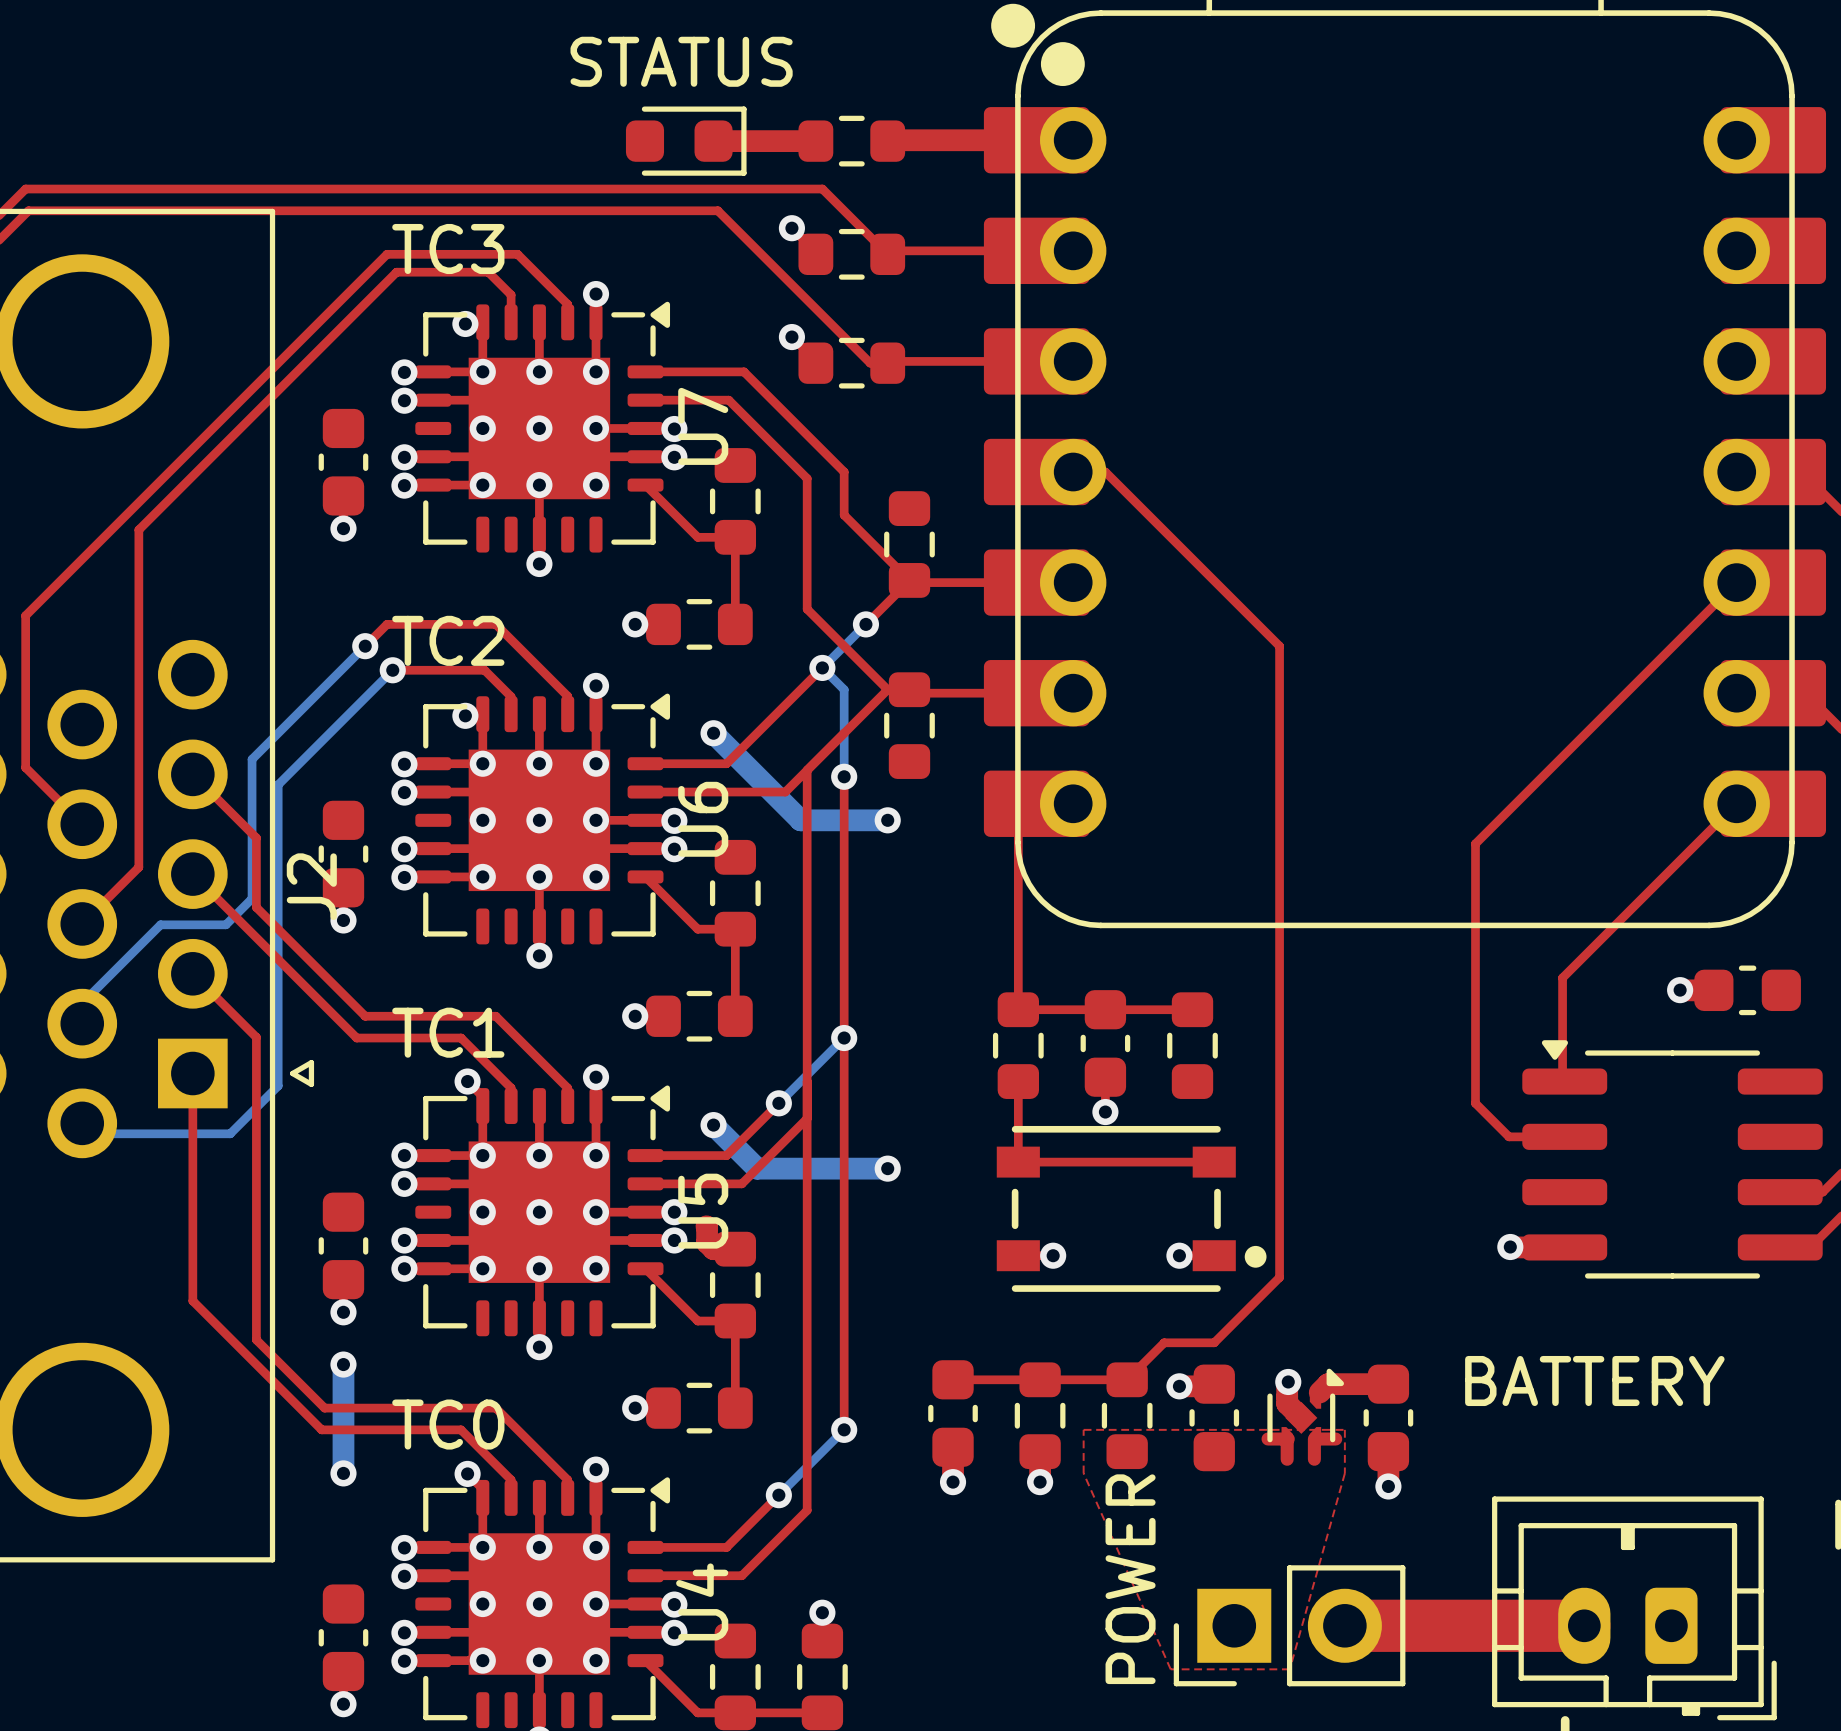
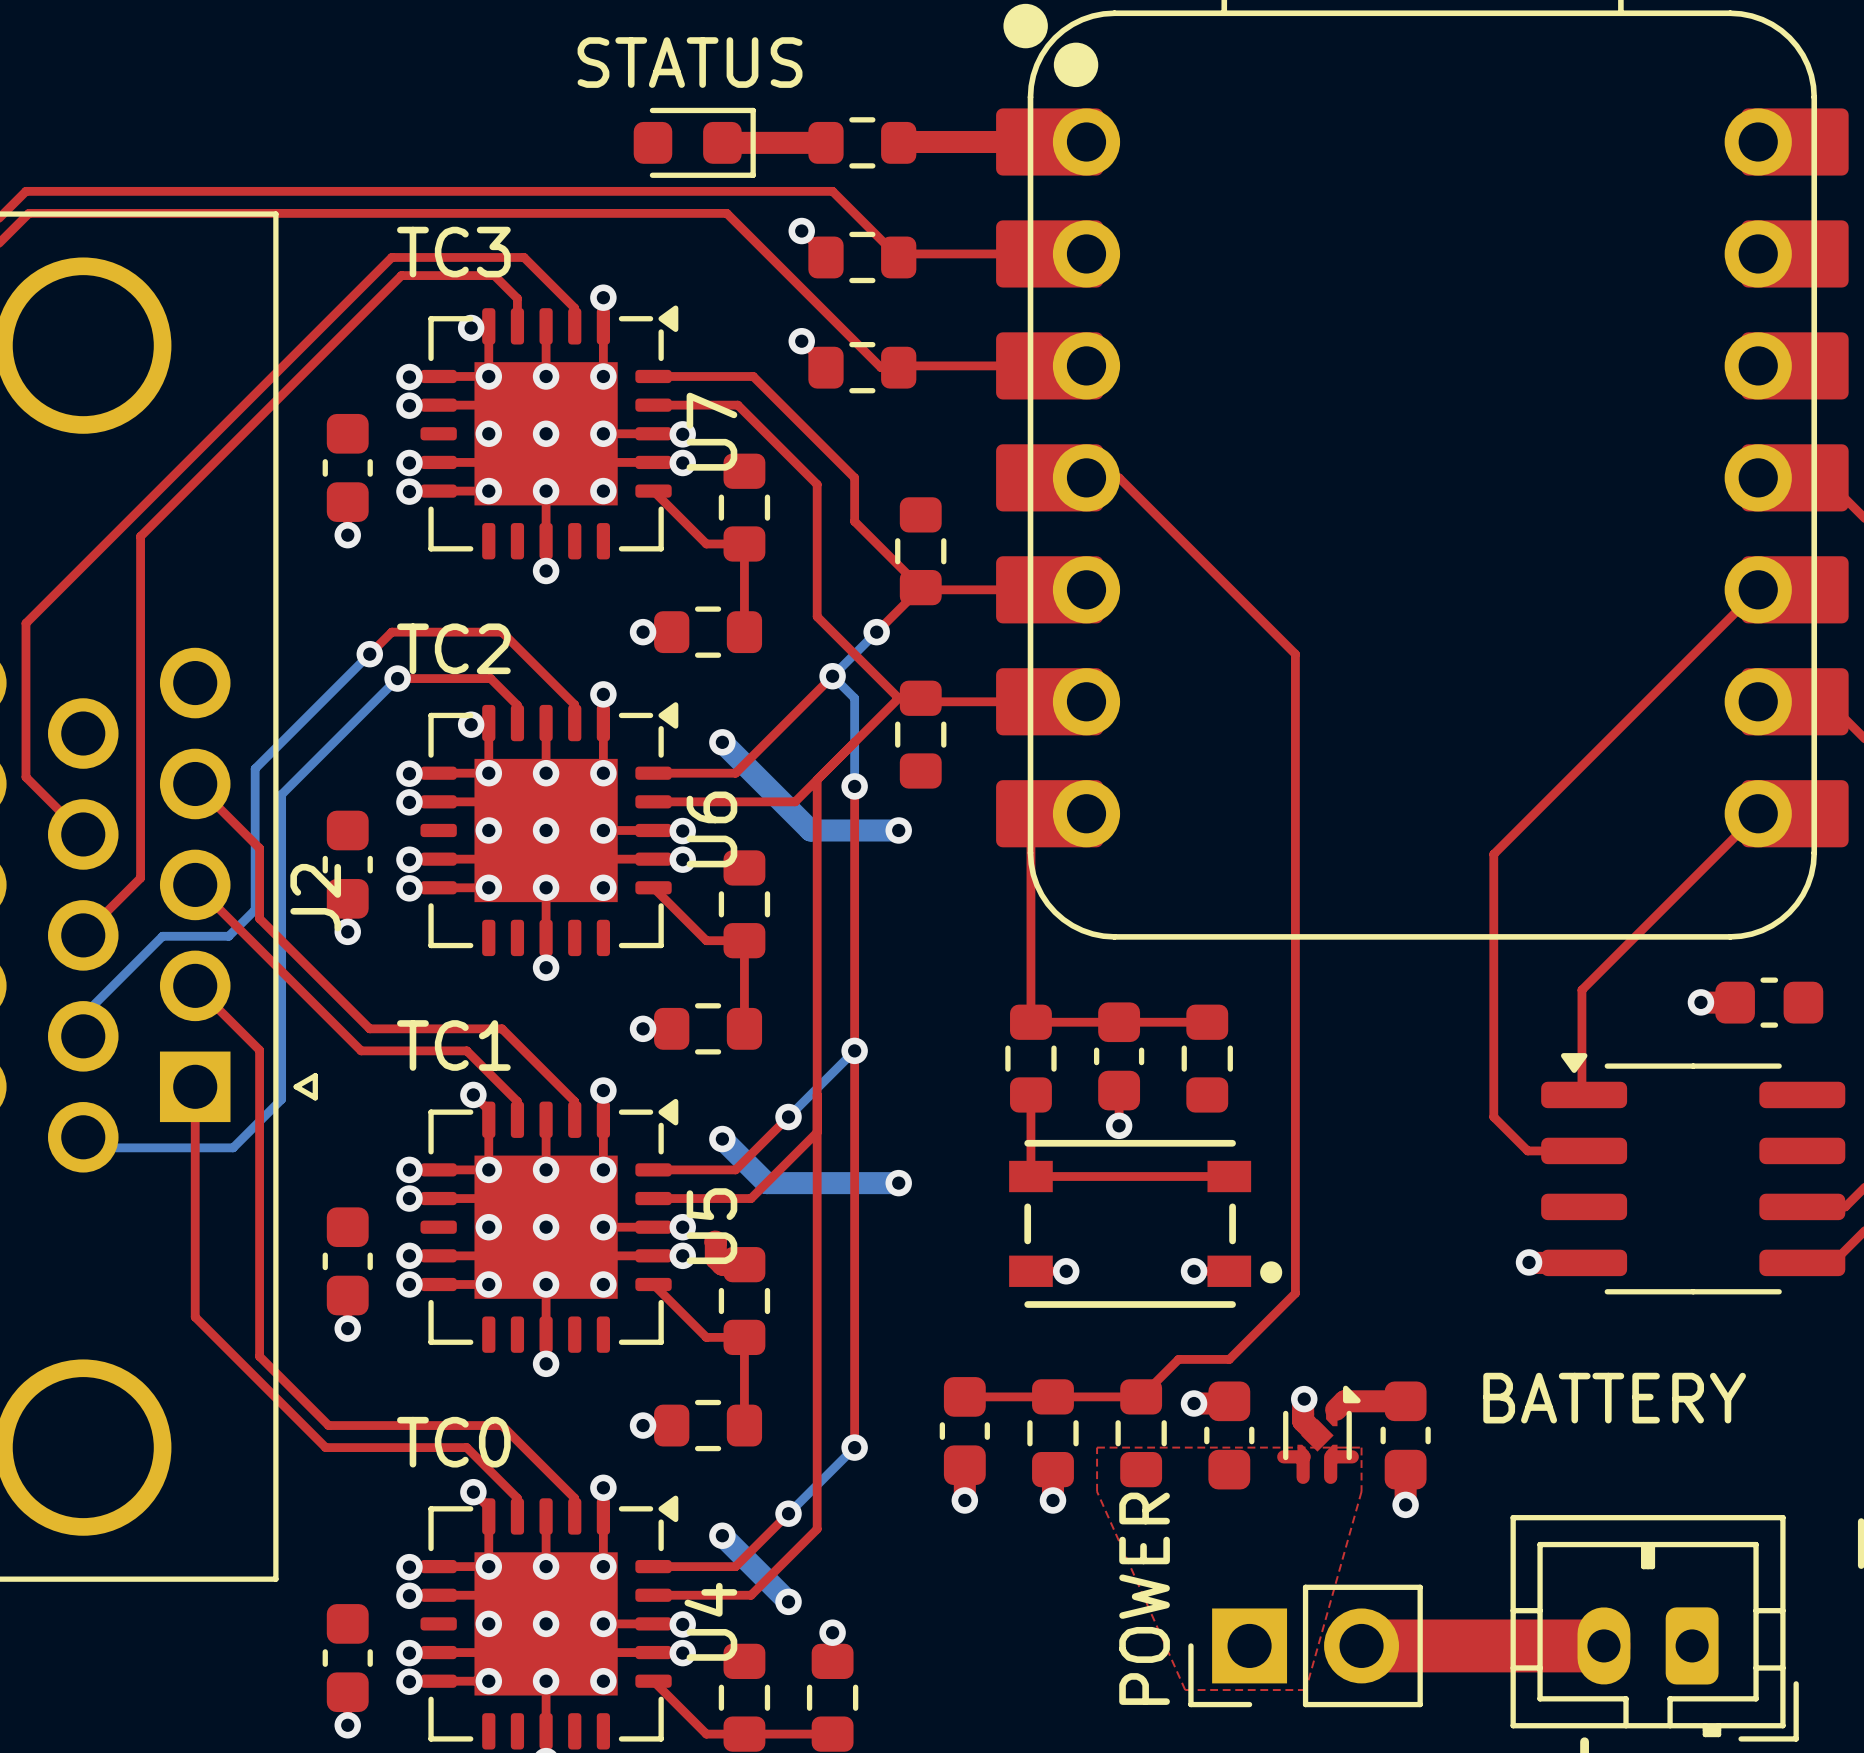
bottom track: (343, 1364) (343, 1473) -> none
via: (343, 1364) -> none
via: (343, 1473) -> none
bottom track: none -> (722, 1535) (788, 1601)
via: none -> (722, 1535)
via: none -> (788, 1601)

